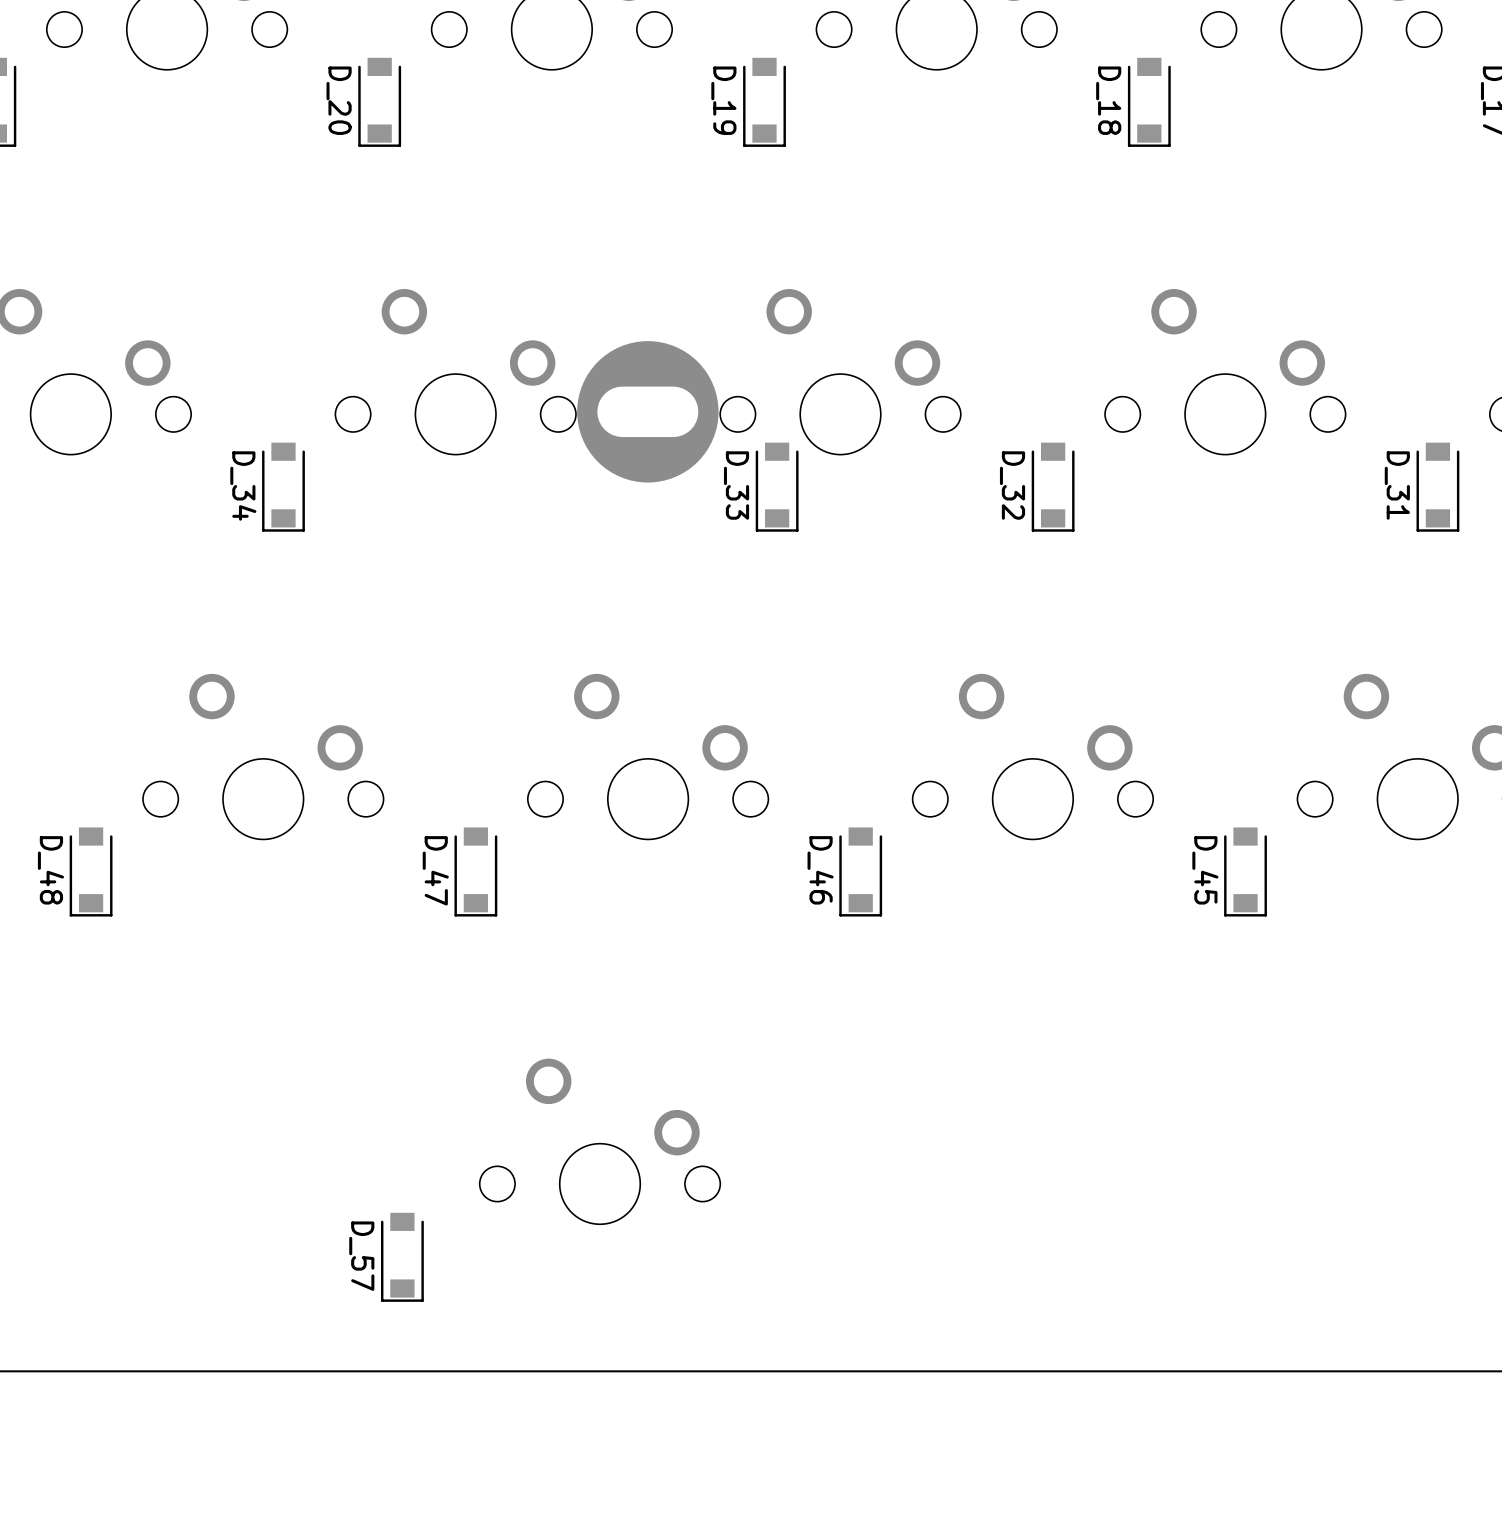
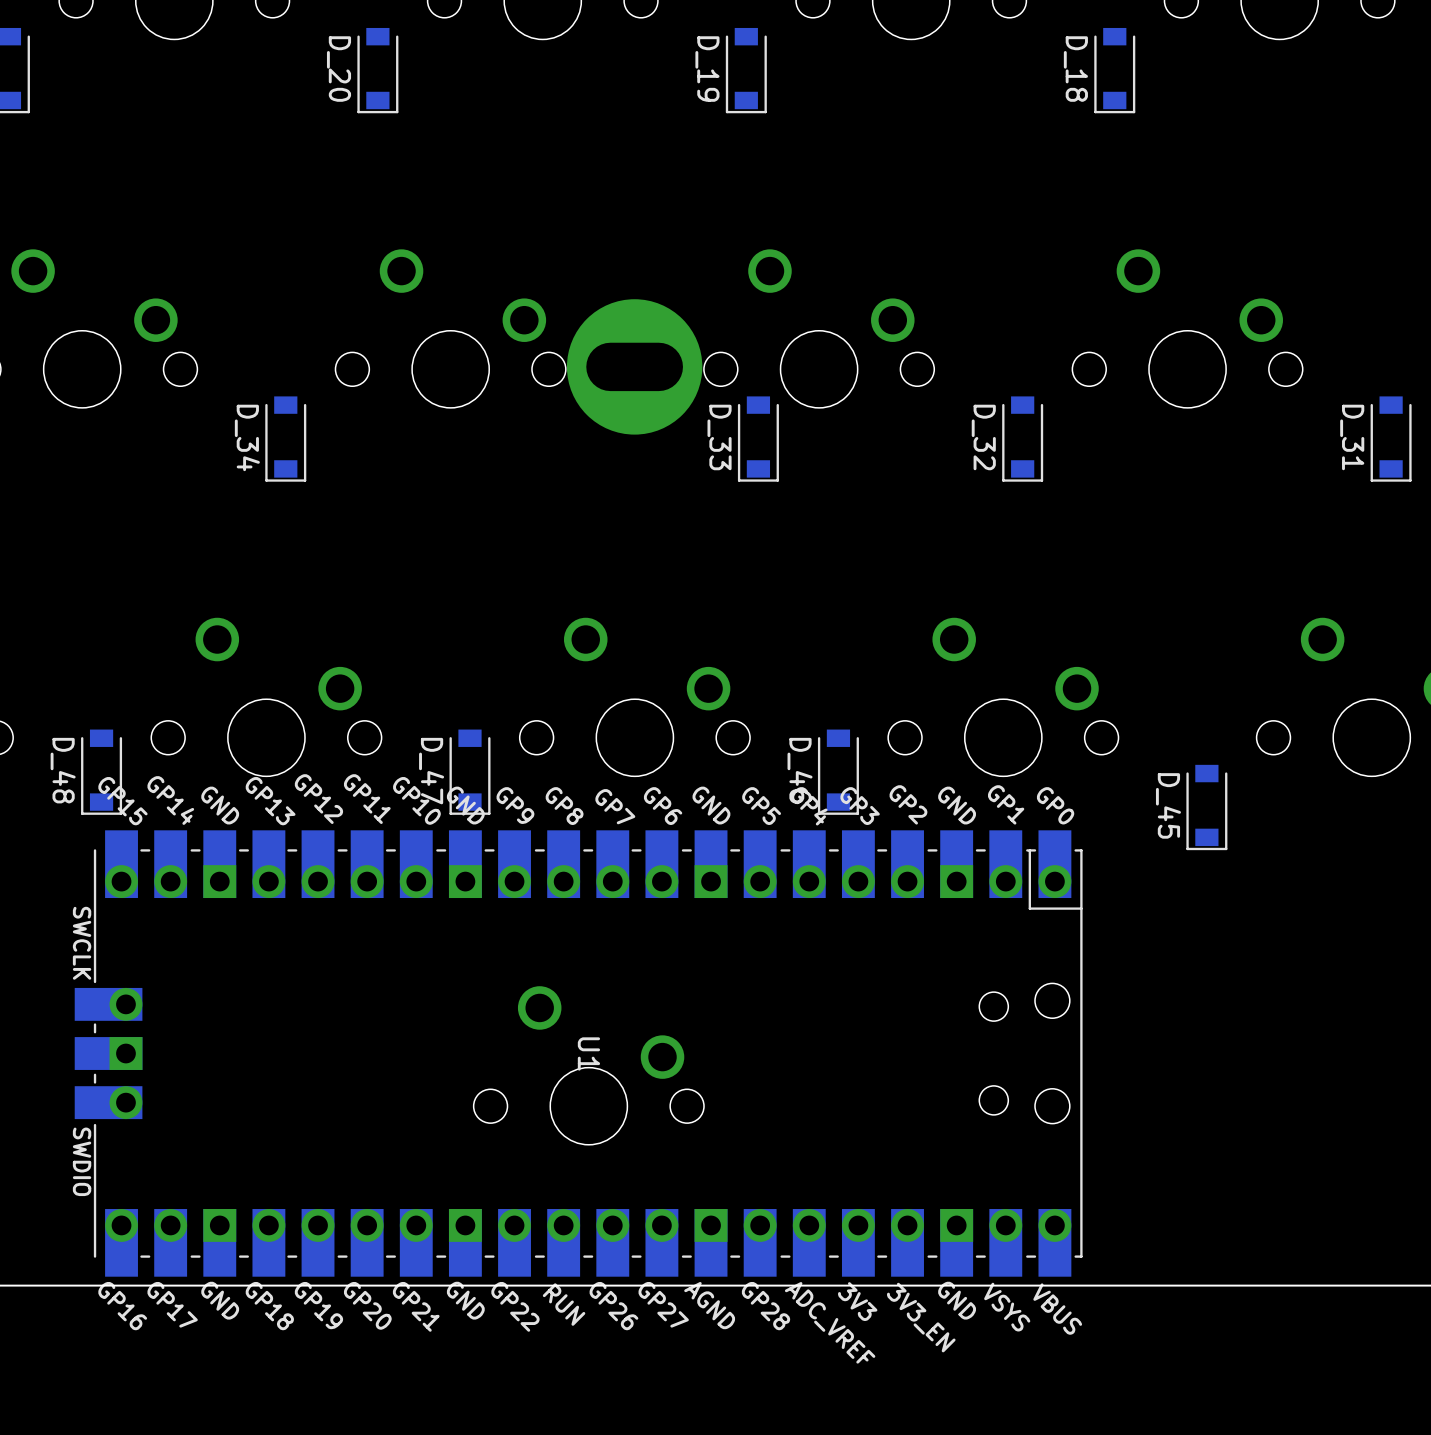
D_48 position: (91, 871) -> (101, 772)
D_47 position: (475, 871) -> (470, 772)
D_46 position: (860, 871) -> (838, 772)
U1: none -> (578, 1053)
D_57: (402, 1257) -> none

